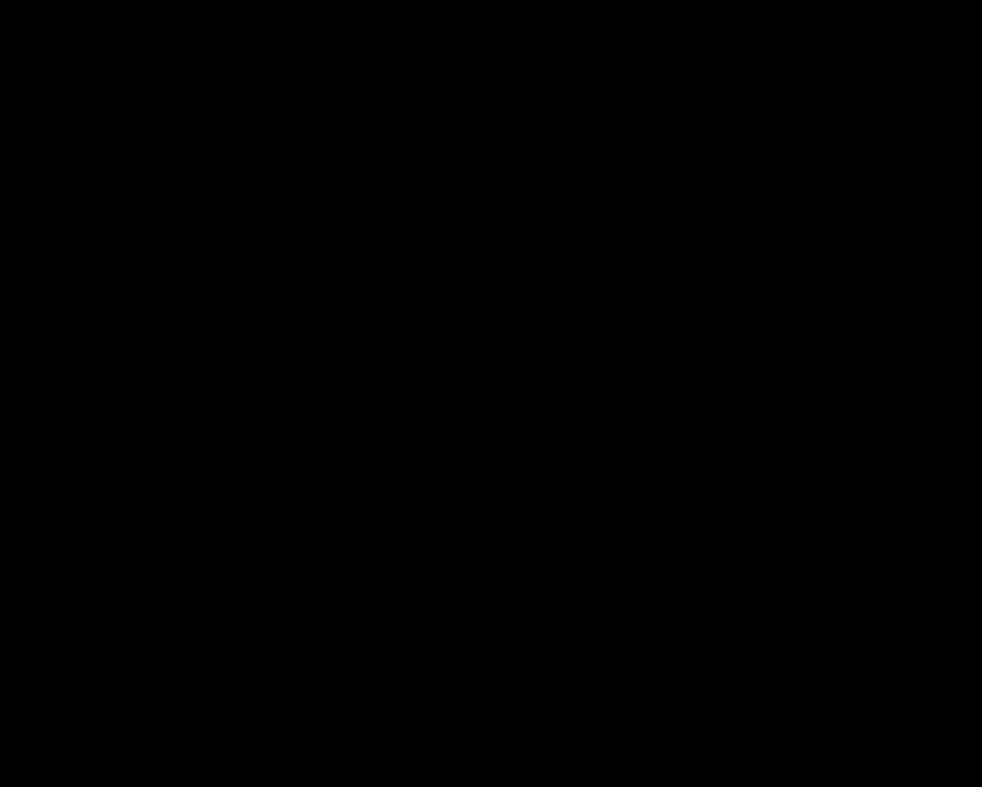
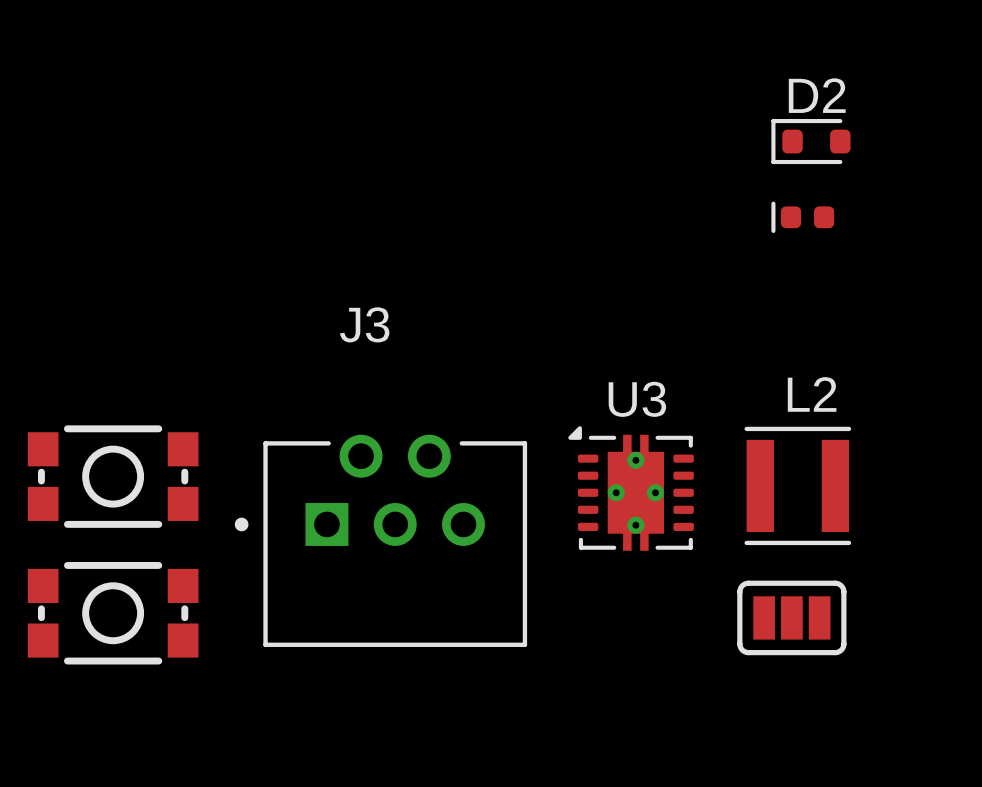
D2: none -> (810, 141)
part: none -> (802, 217)
part: none -> (113, 476)
L2: none -> (797, 485)
U3: none -> (631, 488)
J3: none -> (380, 540)
part: none -> (113, 613)
part: none -> (791, 617)

